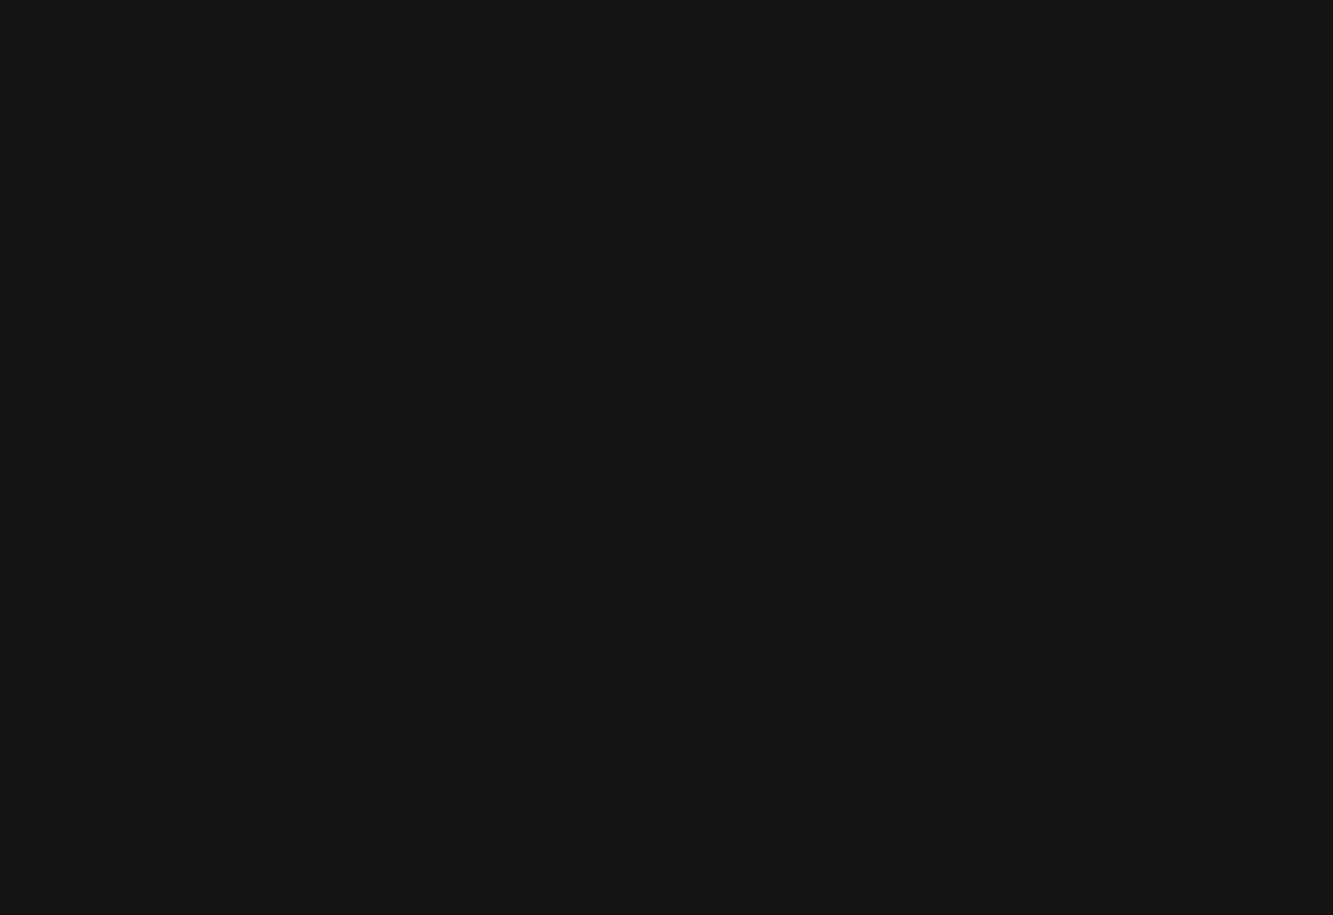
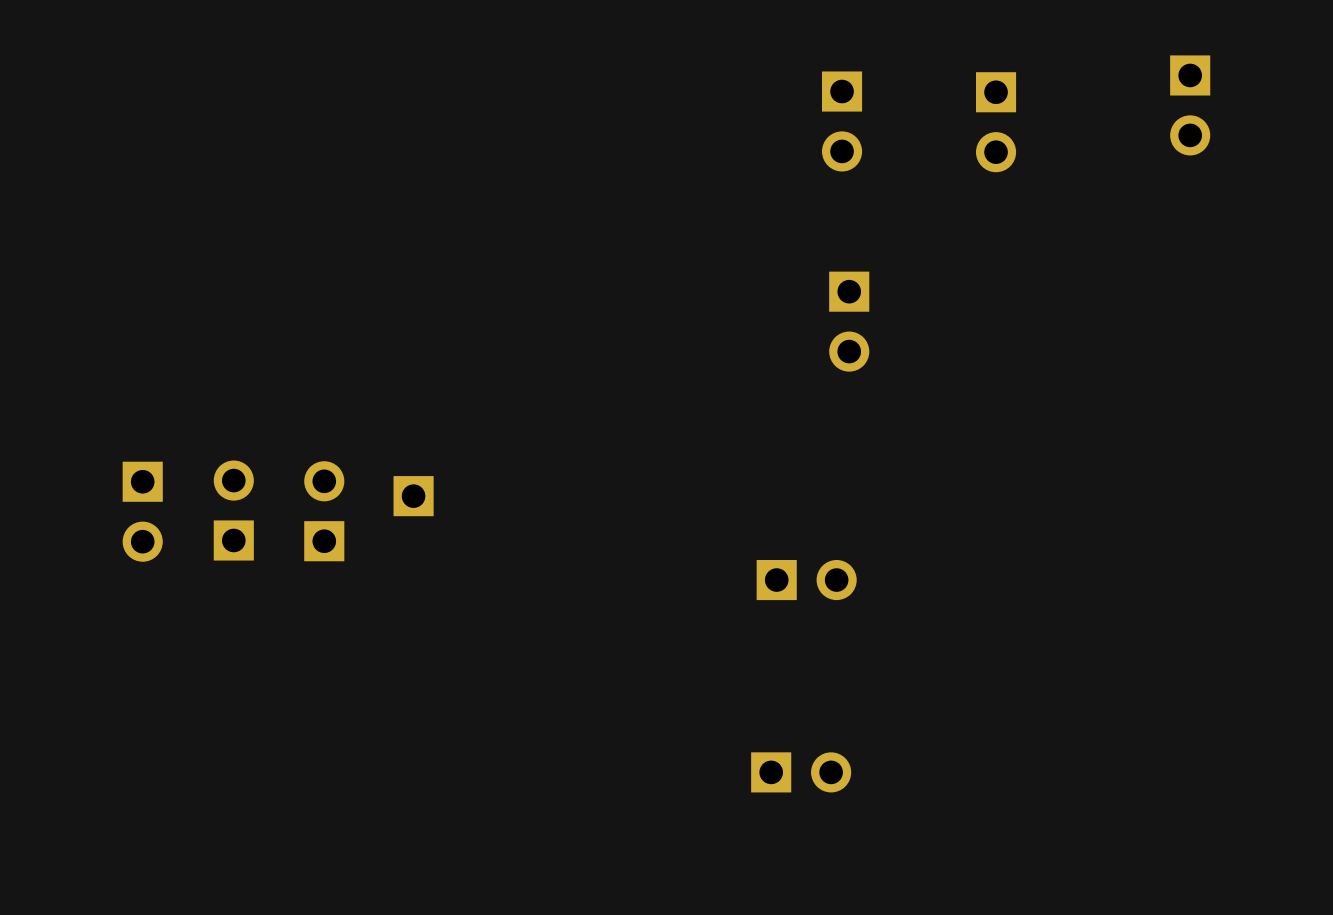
part: none -> (1190, 105)
part: none -> (842, 121)
part: none -> (996, 122)
part: none -> (849, 321)
part: none -> (413, 496)
part: none -> (233, 510)
part: none -> (142, 511)
part: none -> (324, 511)
part: none -> (806, 580)
part: none -> (801, 772)

